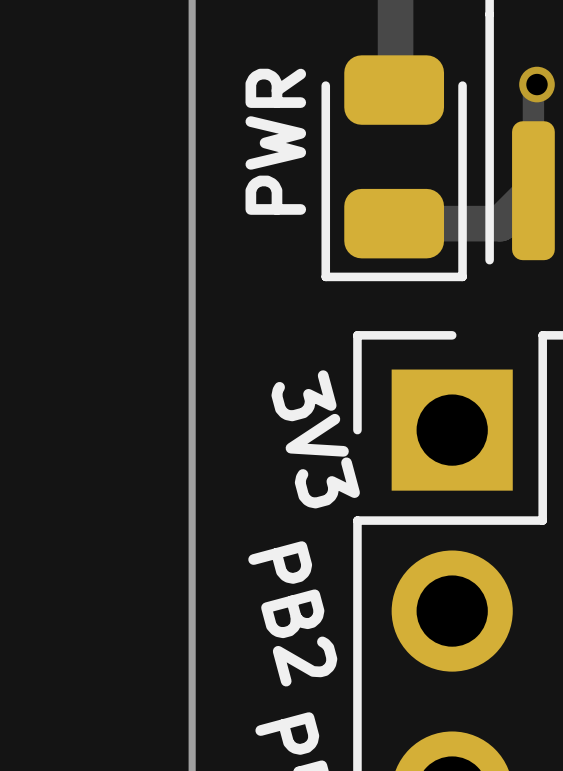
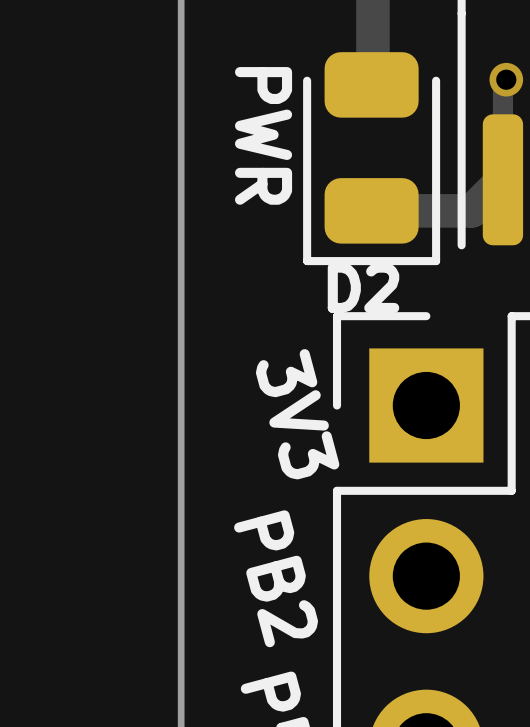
text rotation: 0° (275, 141) -> 180° (263, 135)
D2 name: none -> D2 (363, 287)

